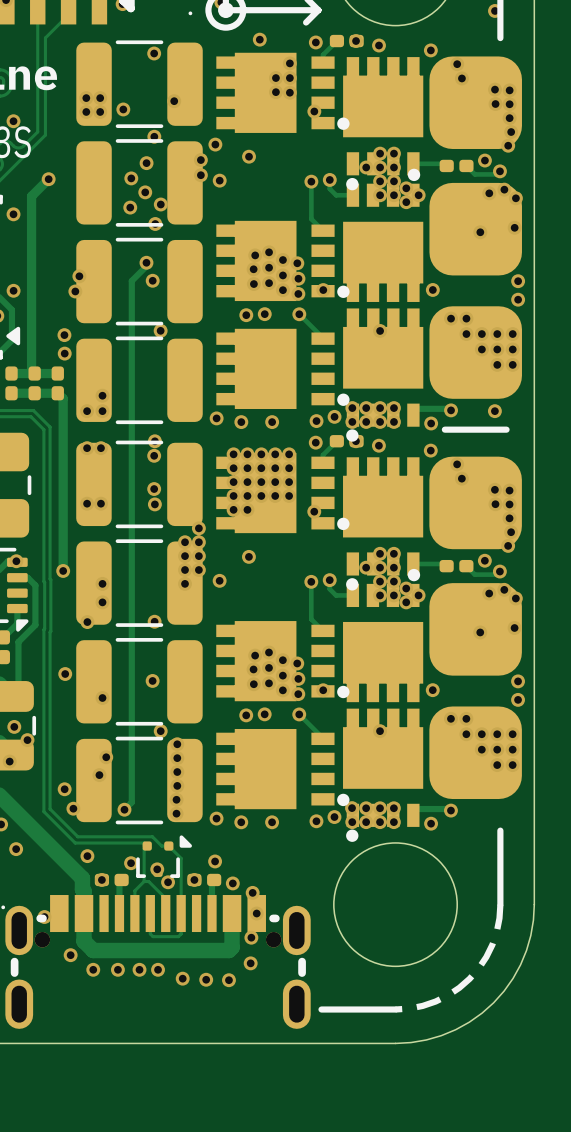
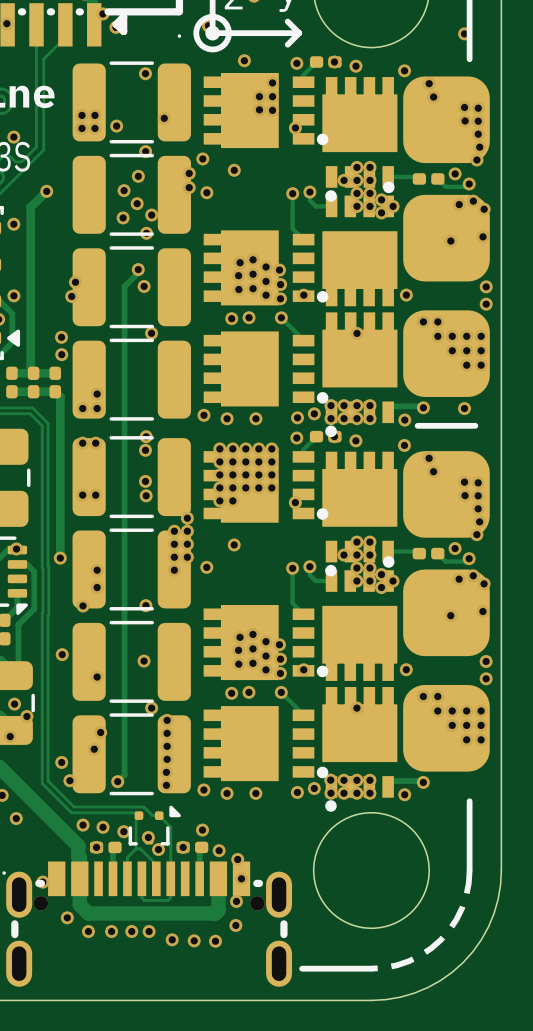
via: none -> (103, 827)

